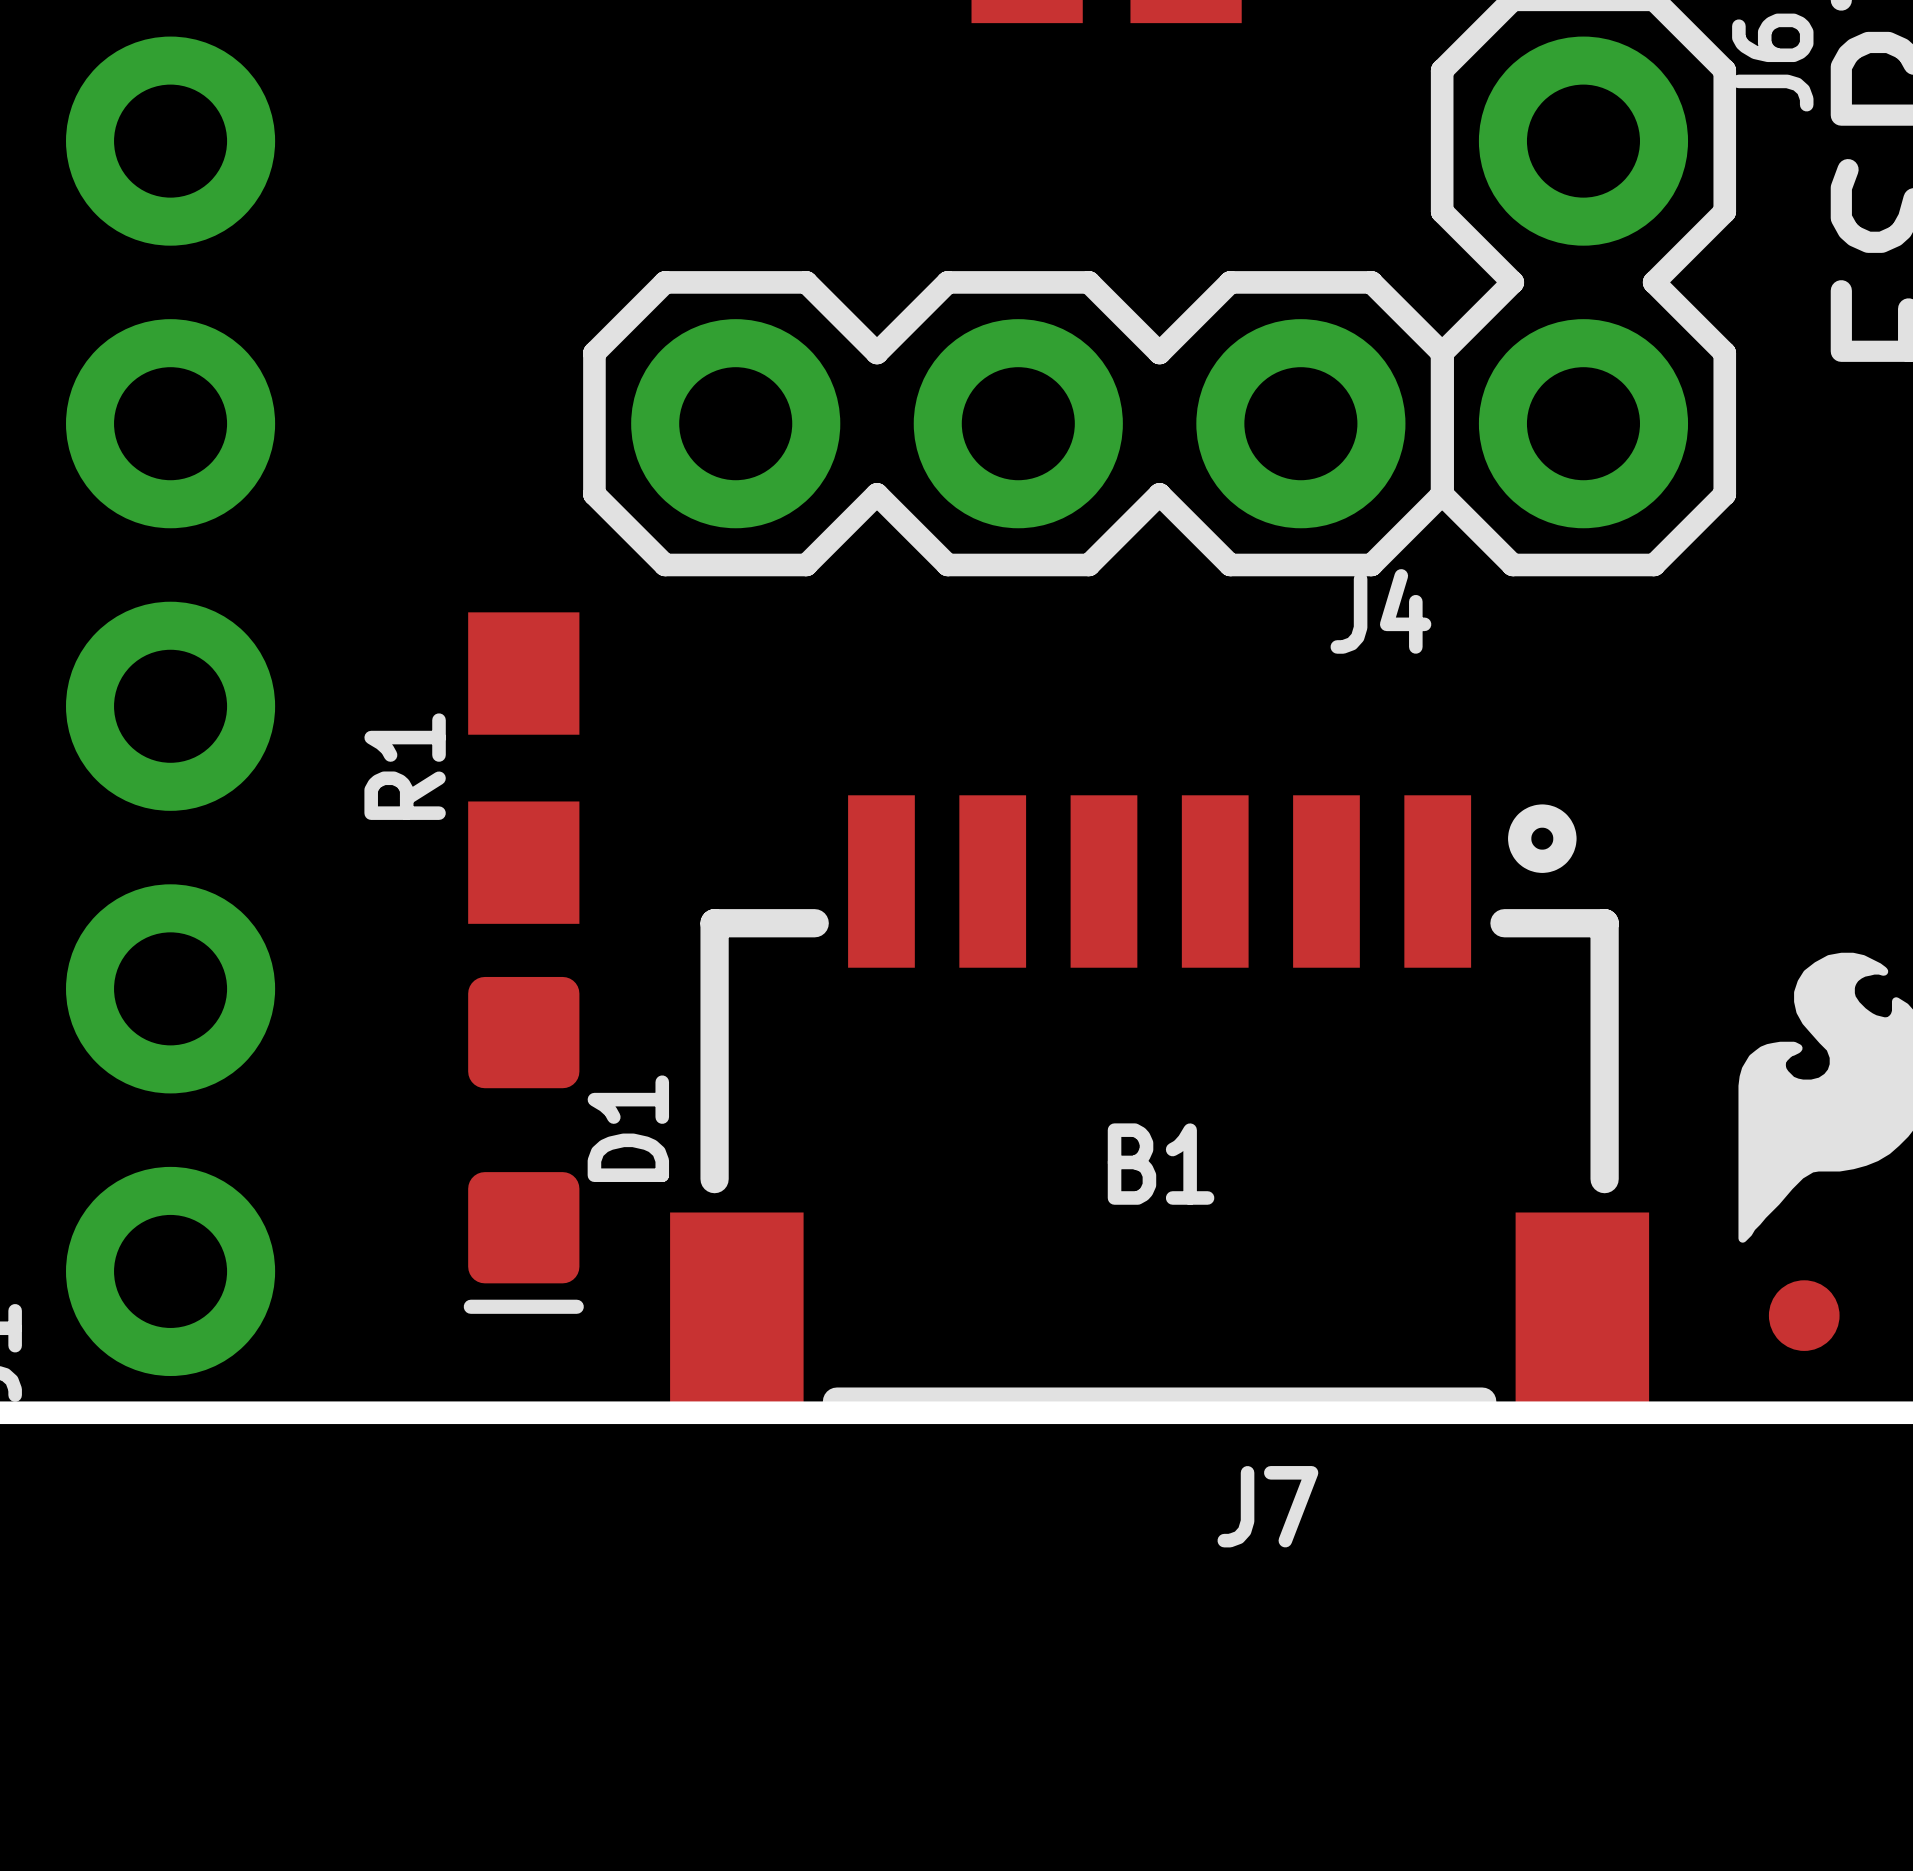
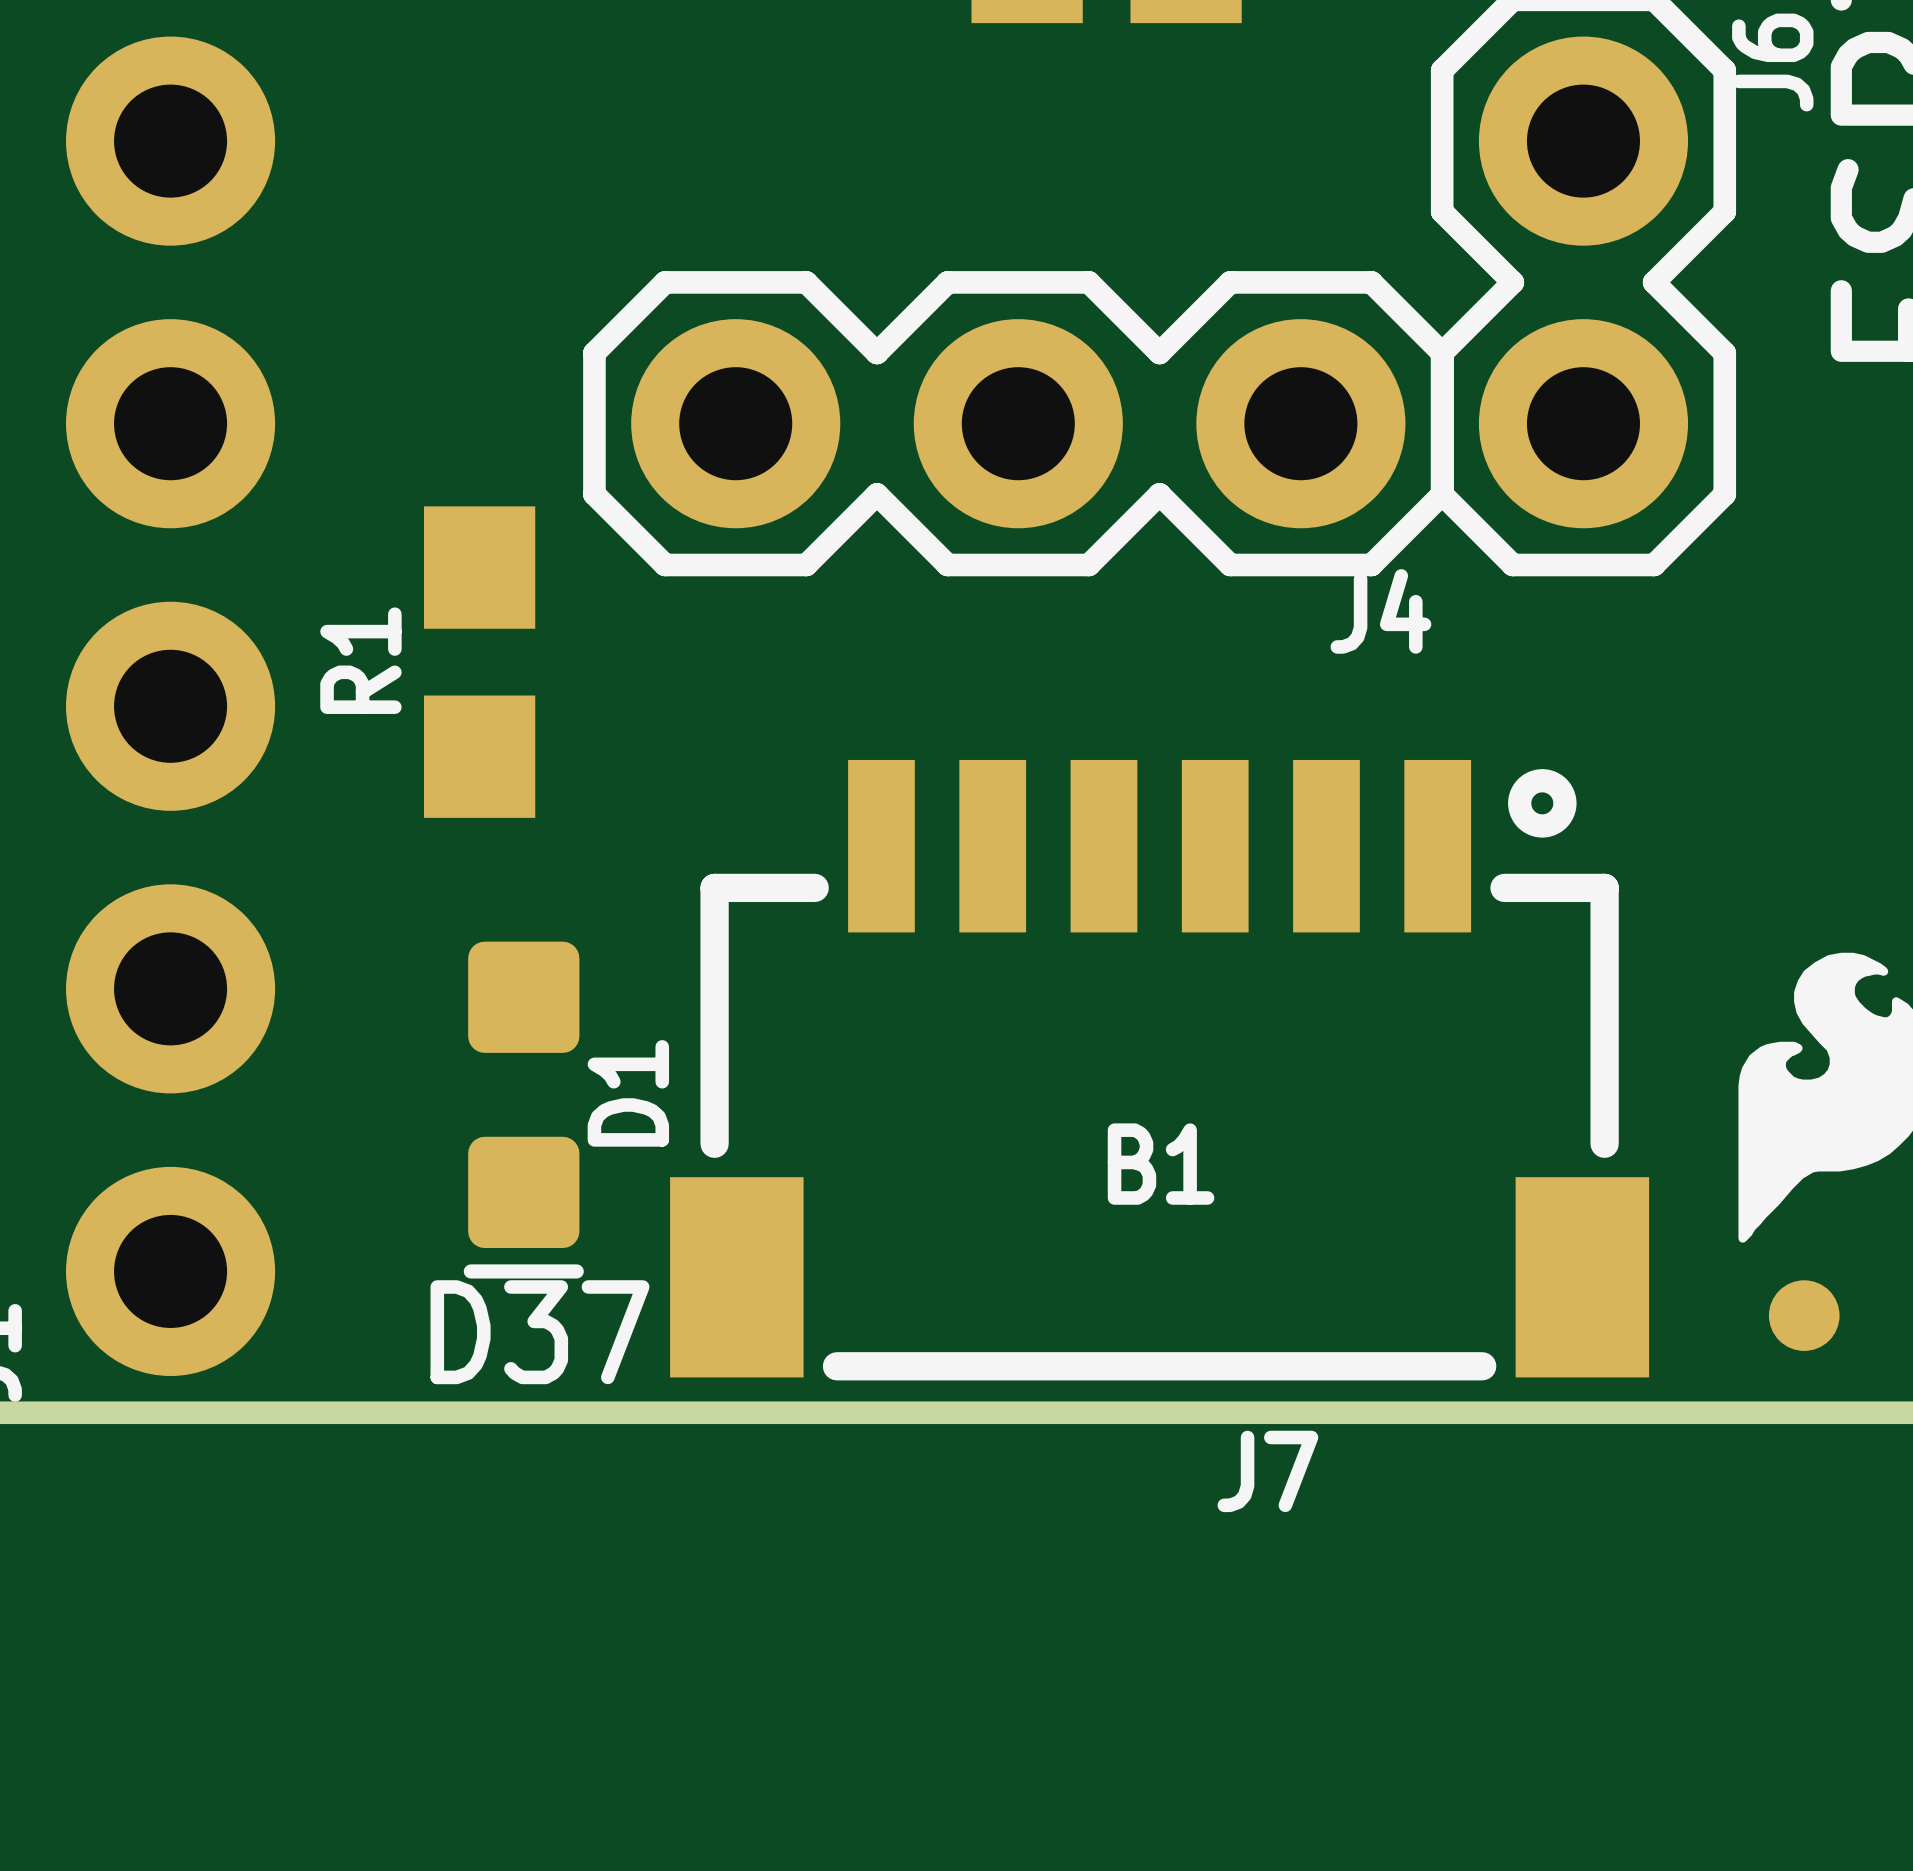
R1 position: (523, 768) -> (479, 662)
J7 position: (1159, 1105) -> (1159, 1070)
D1 position: (523, 1145) -> (523, 1110)
text: none -> D37 (539, 1332)

